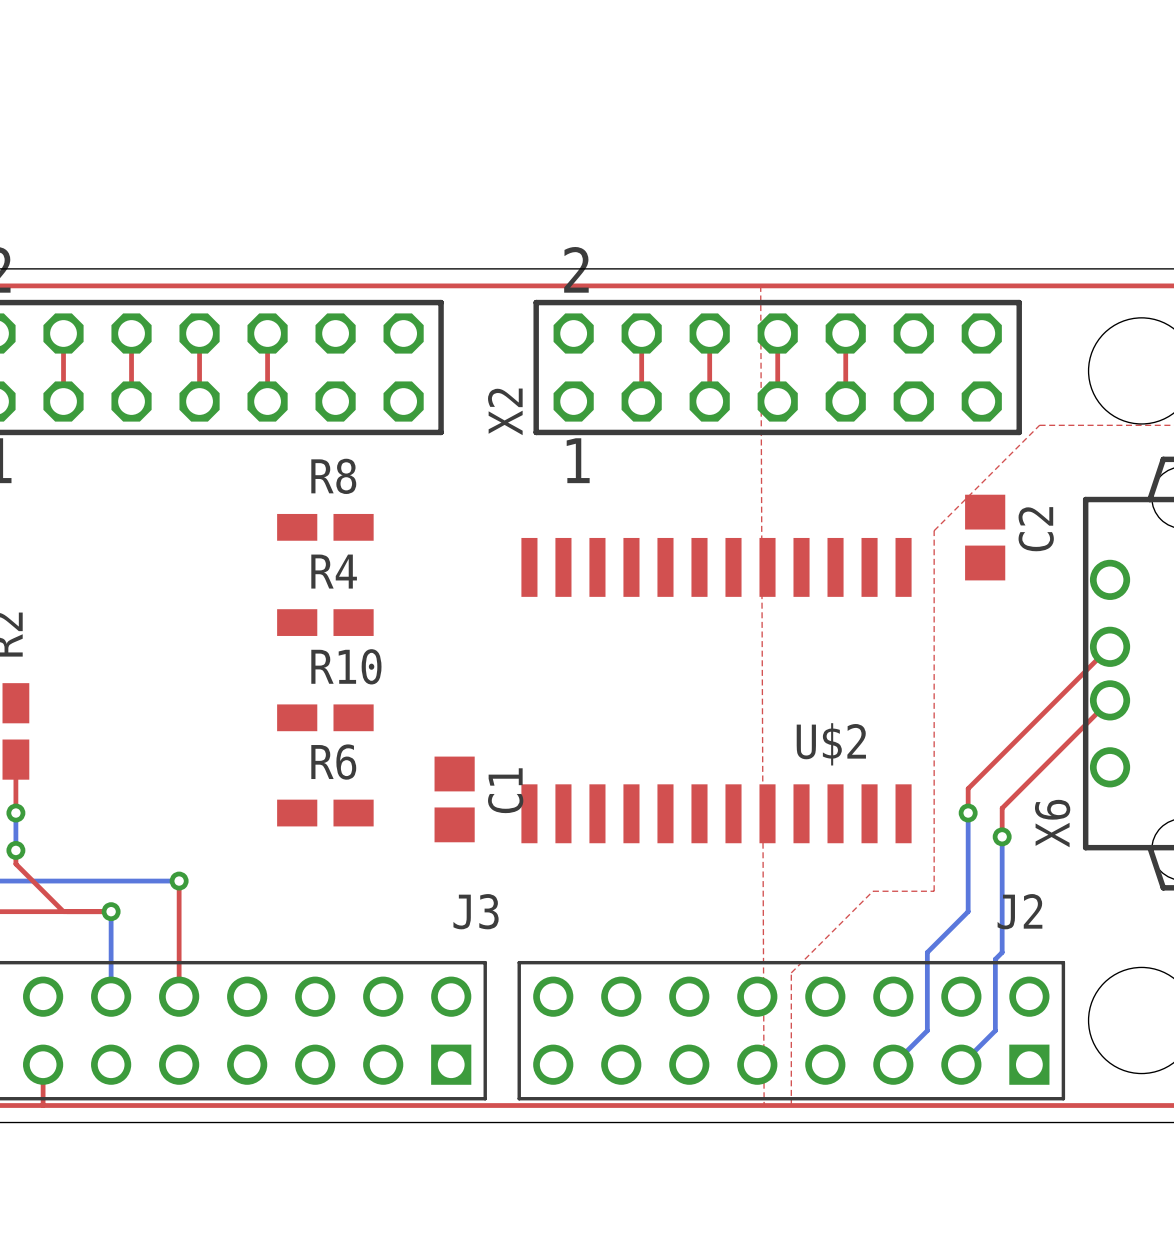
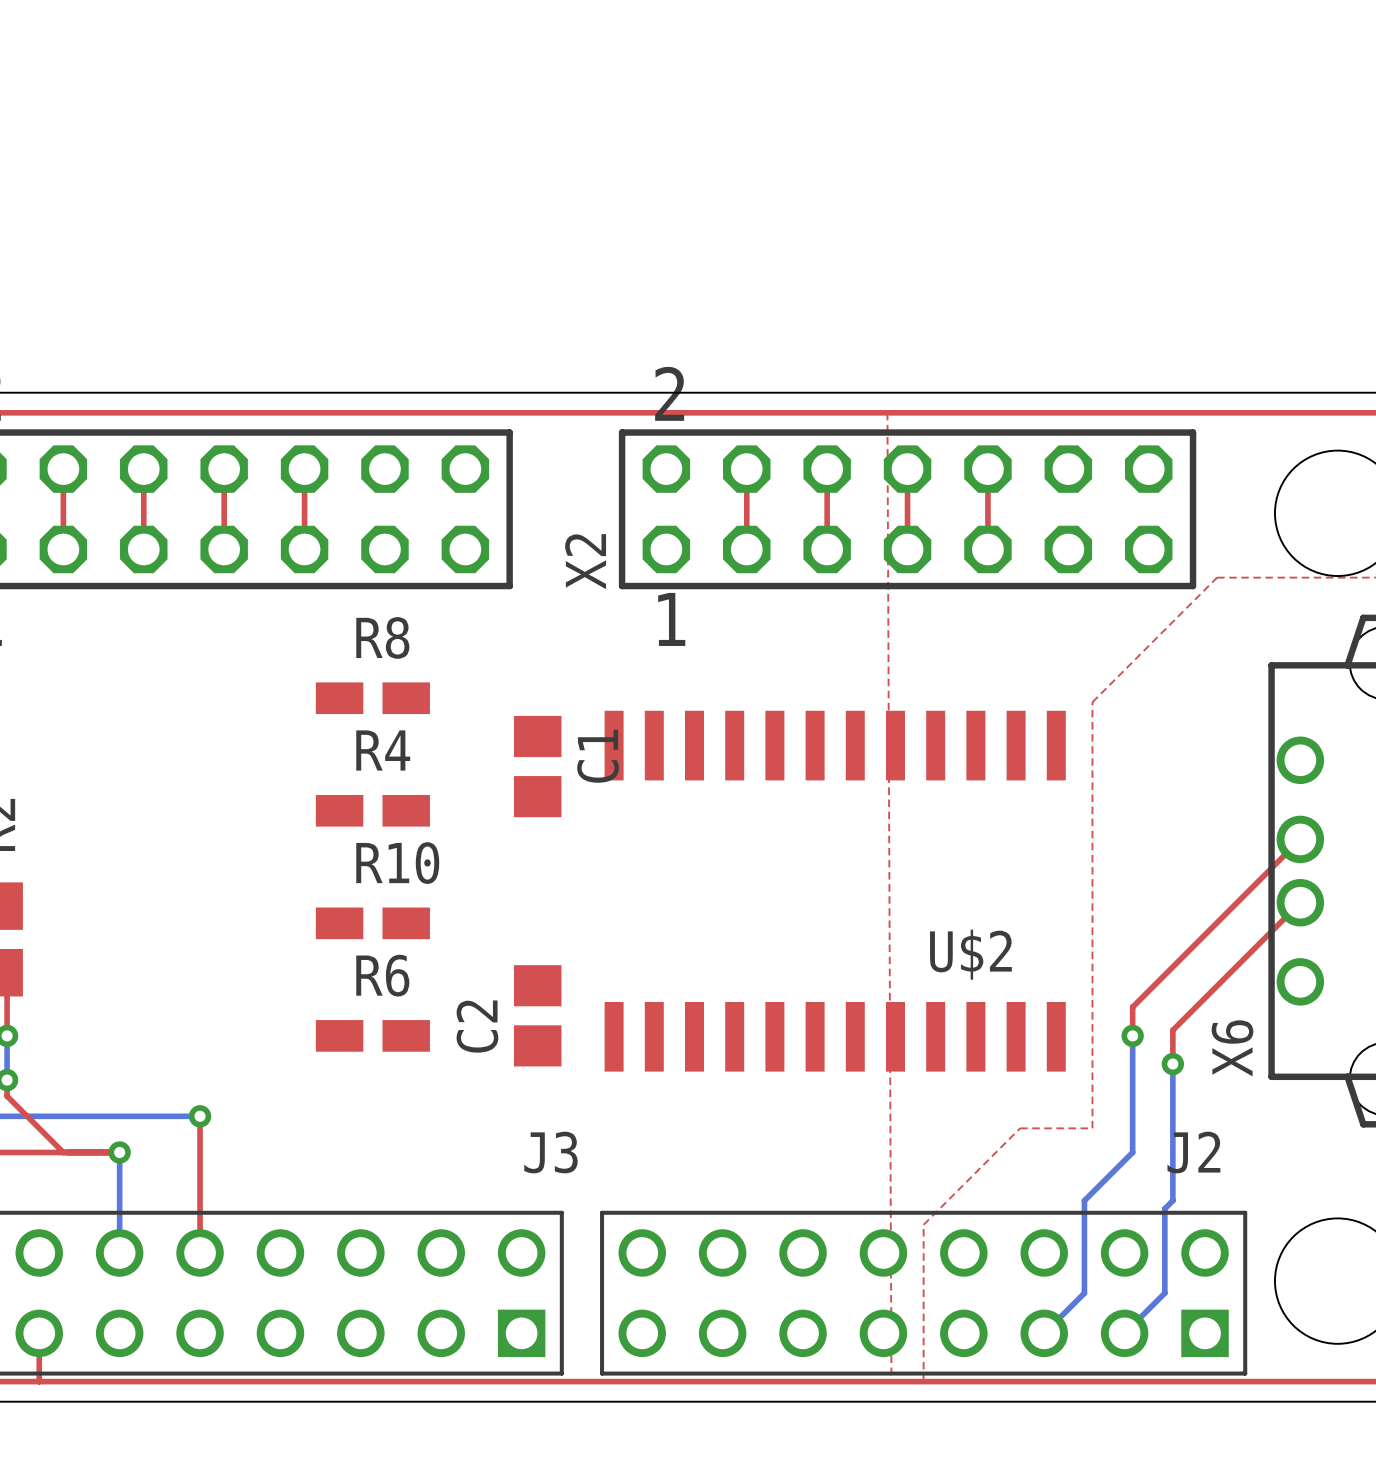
C2 name position: C2 (1036, 529) -> C2 (477, 1026)
C2 position: (985, 537) -> (537, 1015)
C1 position: (454, 799) -> (537, 766)

